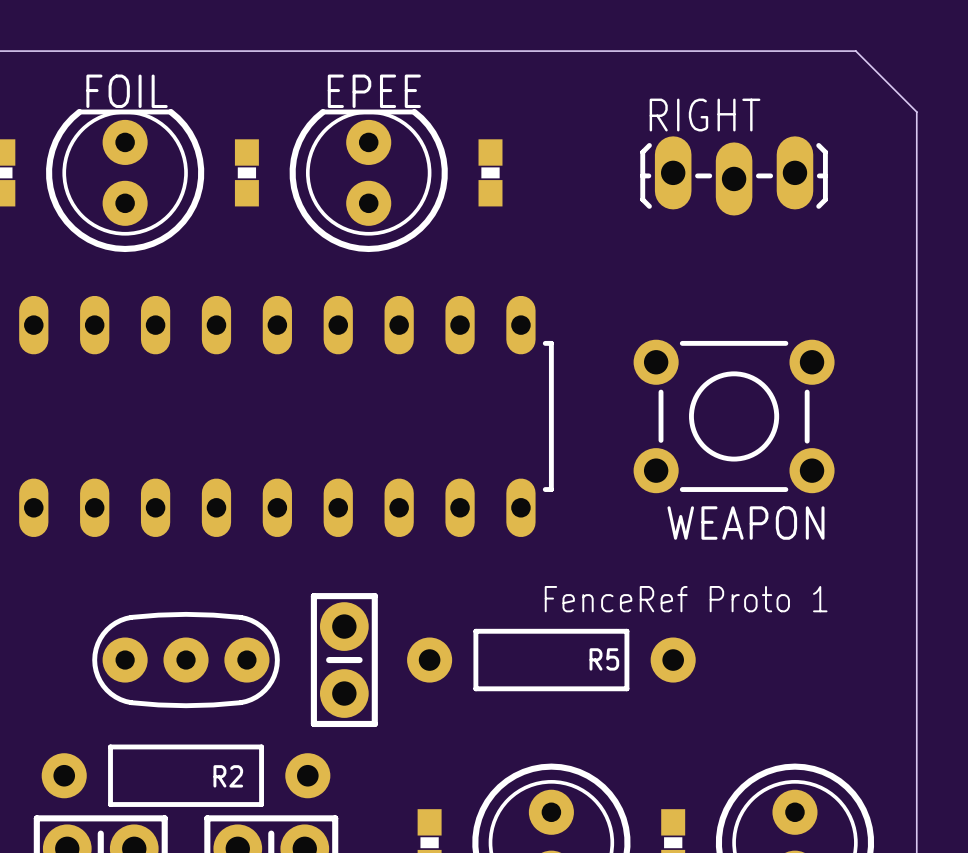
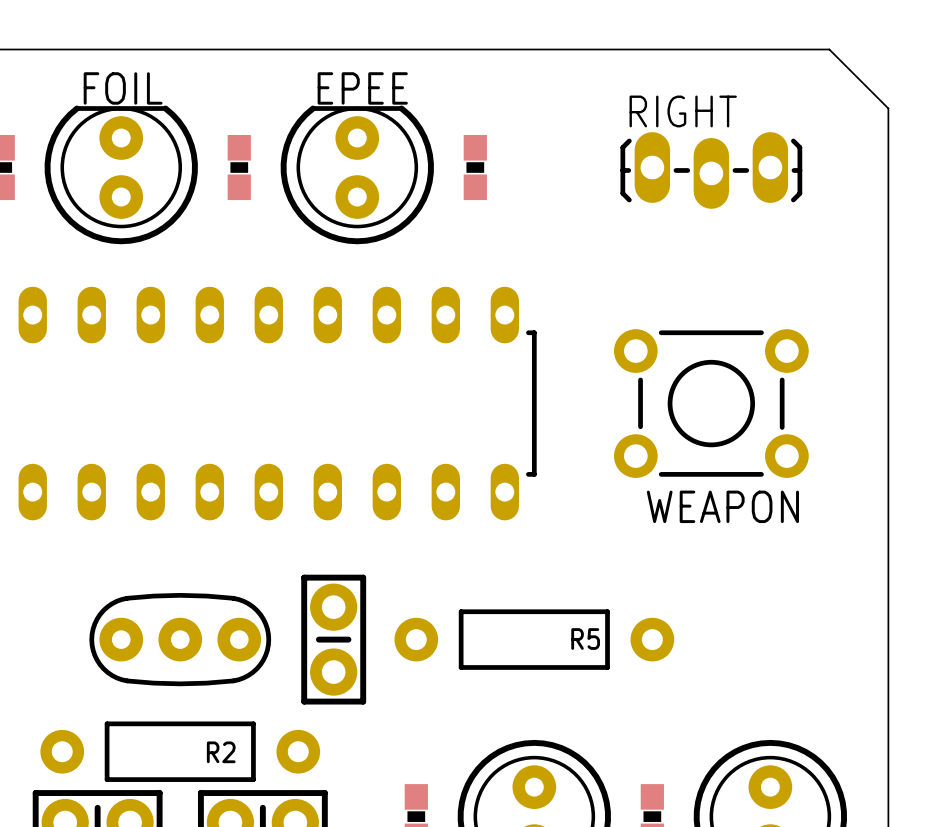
text: FenceRef Proto 1 (686, 599) -> none

